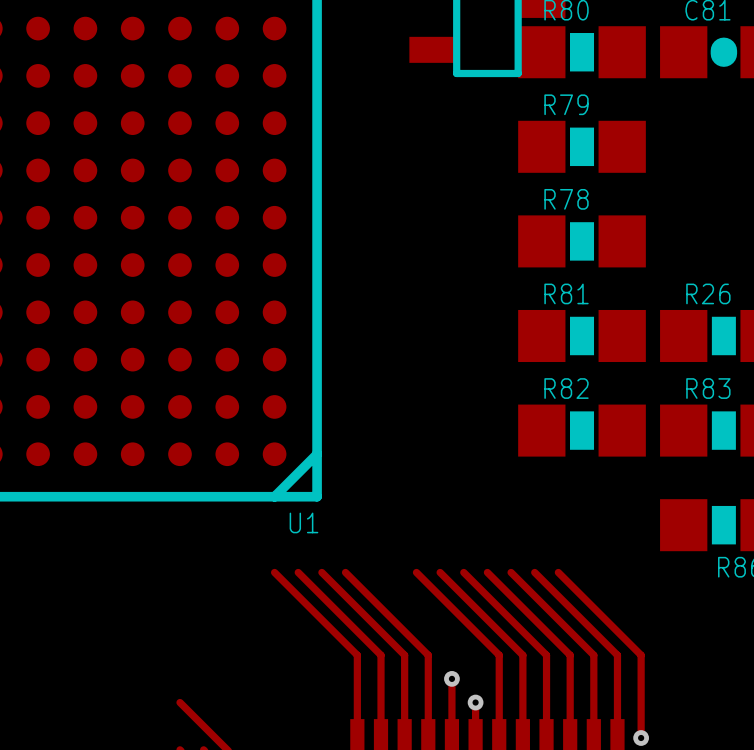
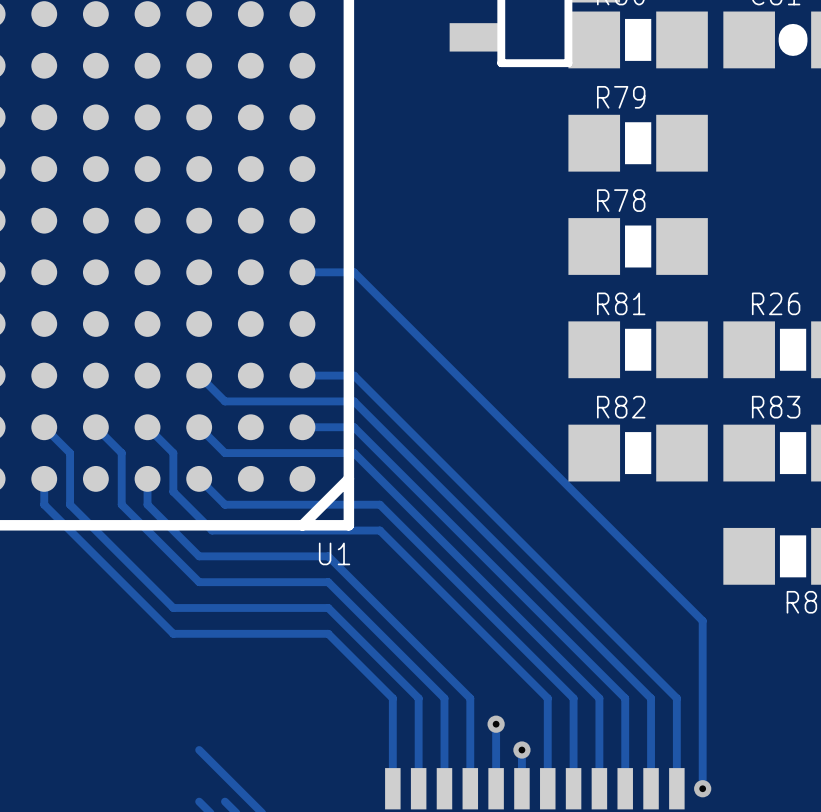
track: none -> (199, 375) (224, 401) (354, 401) (560, 607)
track: none -> (302, 375) (354, 375) (586, 607)
track: none -> (44, 427) (70, 453) (70, 504) (173, 607) (328, 607)
track: none -> (95, 427) (121, 453) (121, 504) (199, 582) (328, 582) (354, 607)
track: none -> (147, 427) (173, 453) (173, 491) (212, 530) (379, 530) (457, 607)
track: none -> (199, 427) (224, 453) (354, 453) (509, 607)
track: none -> (302, 427) (354, 427) (534, 607)
track: none -> (147, 478) (147, 504) (199, 556) (328, 556) (379, 607)
track: none -> (199, 478) (224, 504) (379, 504) (483, 607)
track: (274, 572) (298, 596) -> (44, 478) (44, 504) (173, 633) (328, 633)
track: (558, 572) (641, 655) -> (302, 272) (354, 272) (702, 620) (702, 698)

